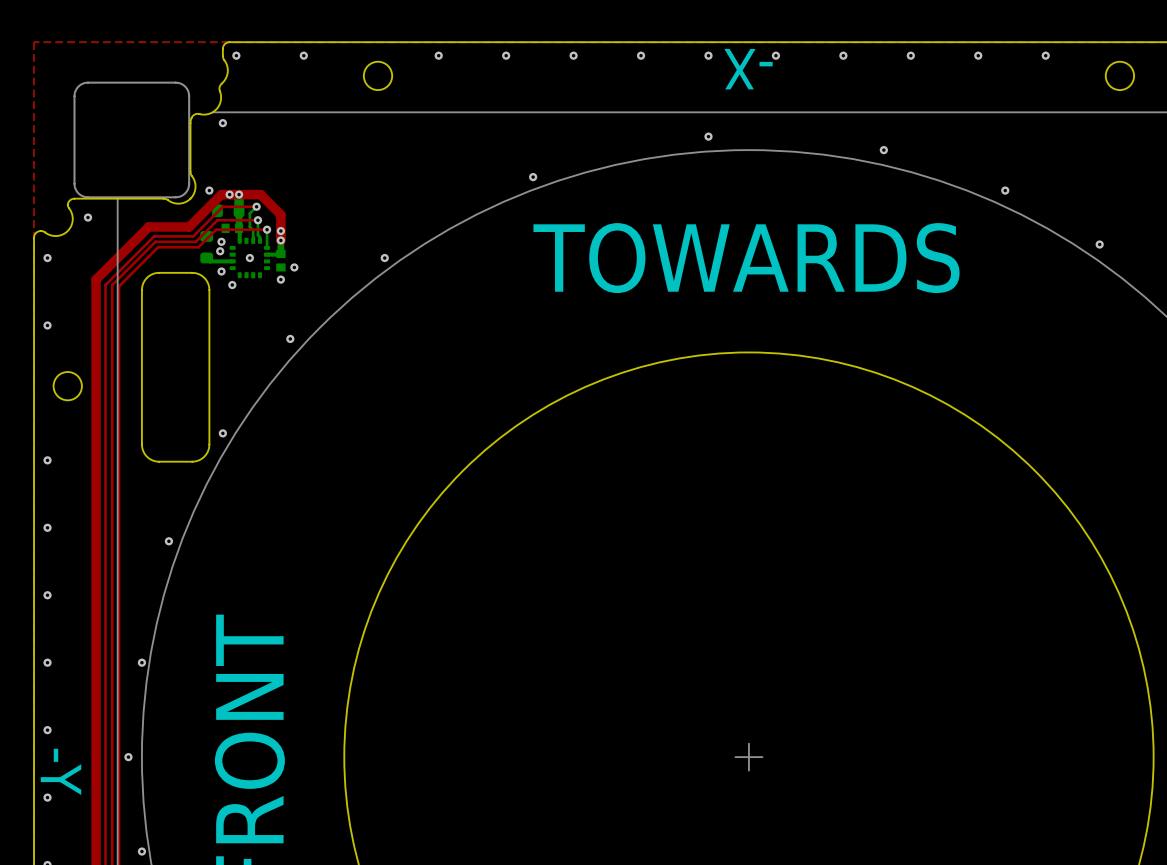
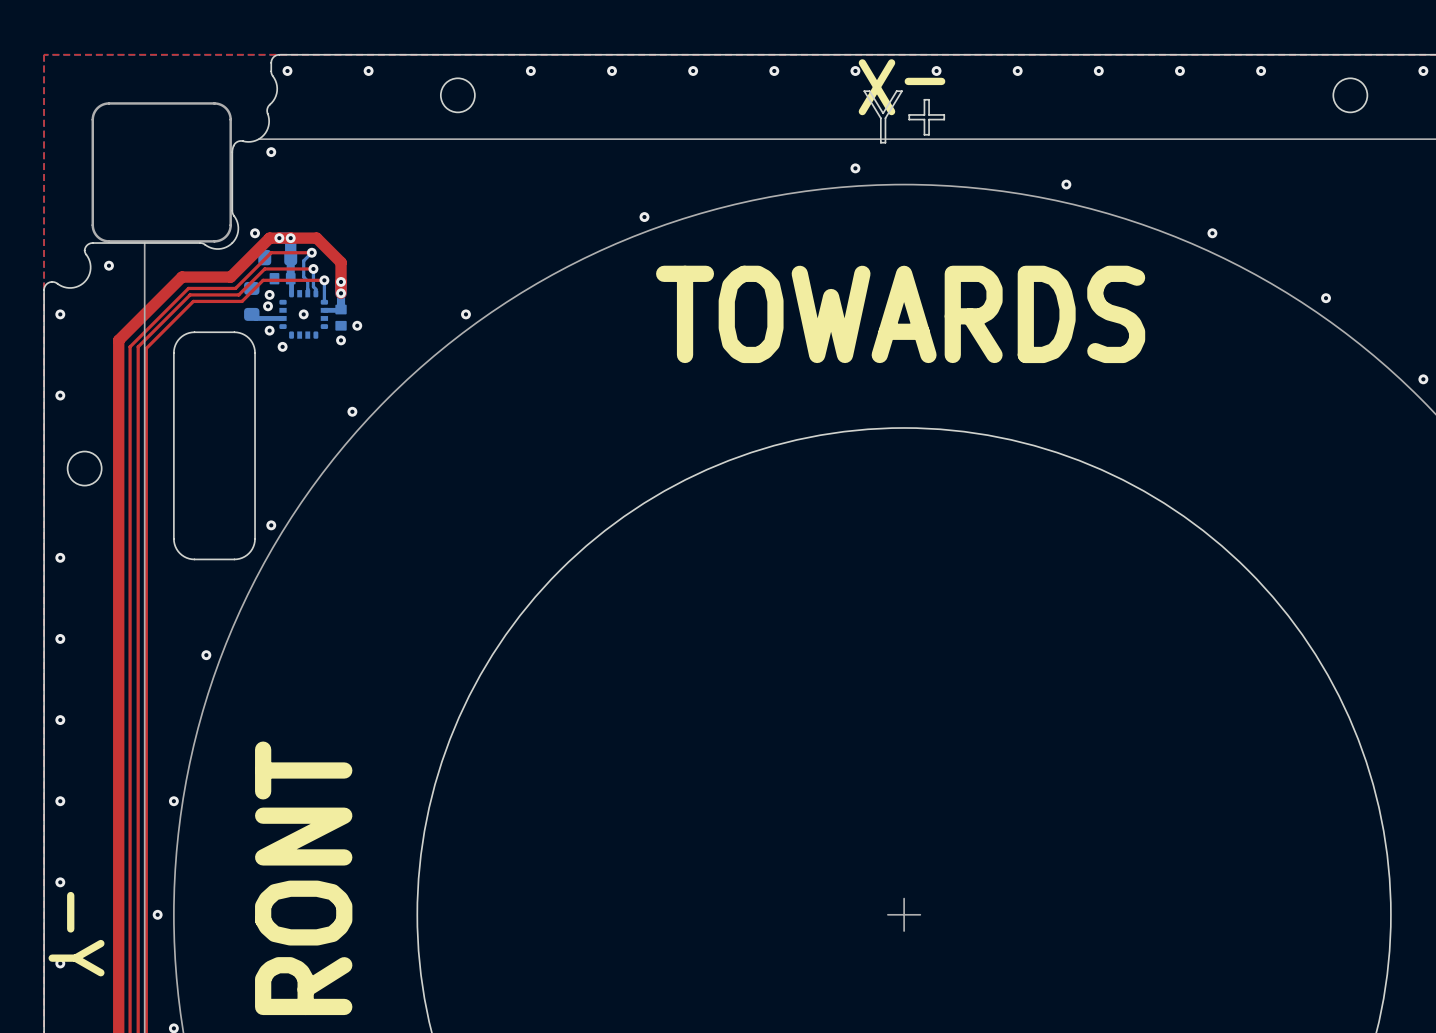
board edge: none -> (864, 91) (869, 91) (883, 113) (896, 91) (901, 91) (885, 118) (885, 142) (880, 142) (880, 118) (864, 91)
board edge: none -> (924, 99) (929, 99) (929, 114) (944, 114) (944, 119) (929, 119) (929, 134) (924, 134) (924, 119) (909, 119) (909, 114) (924, 114) (924, 99)

